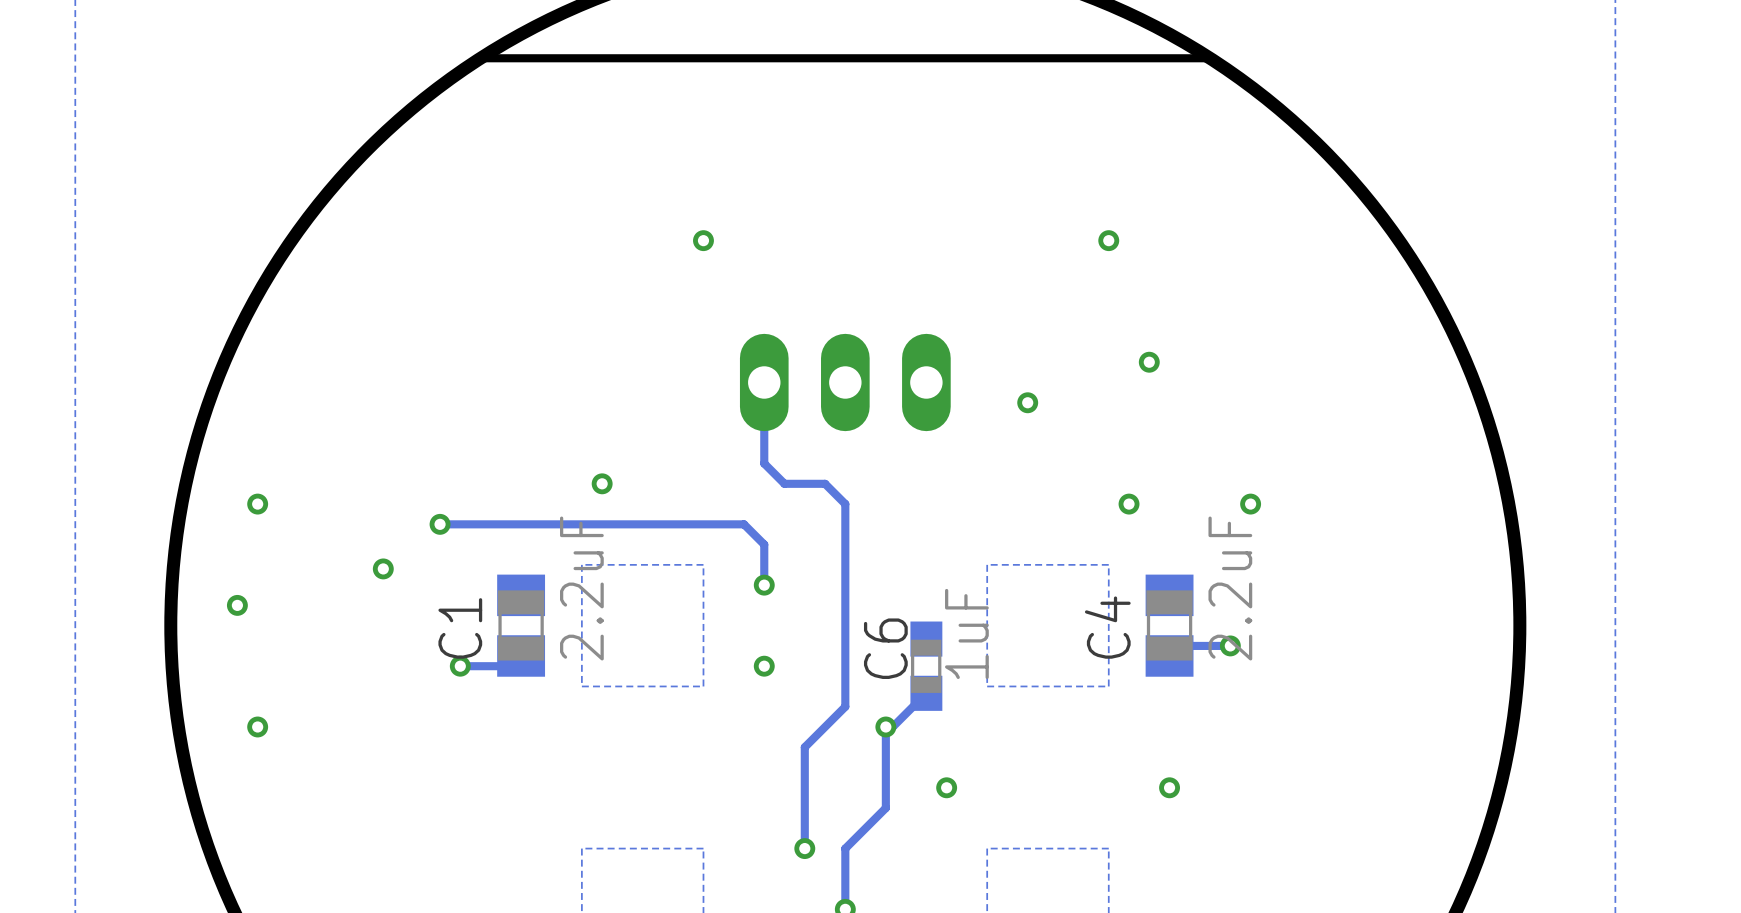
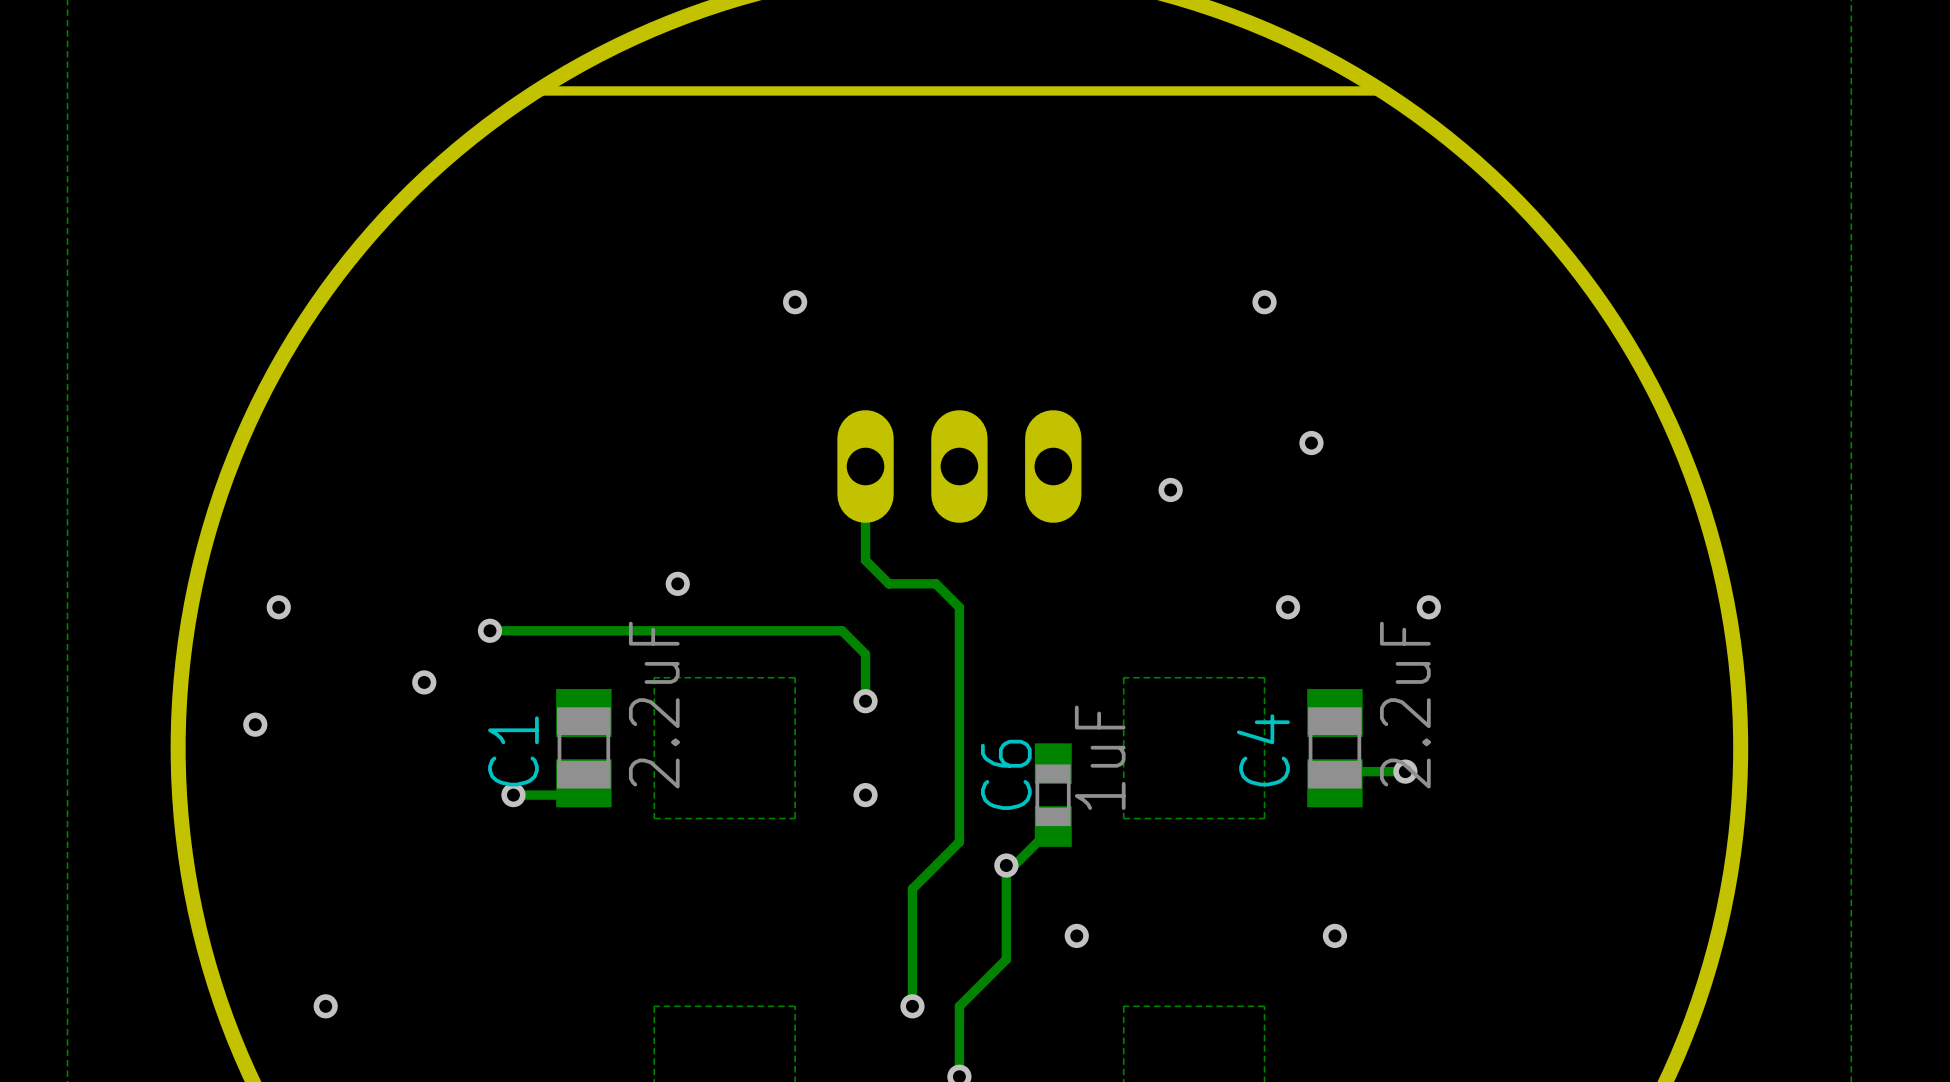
via position: (257, 726) -> (325, 1006)

